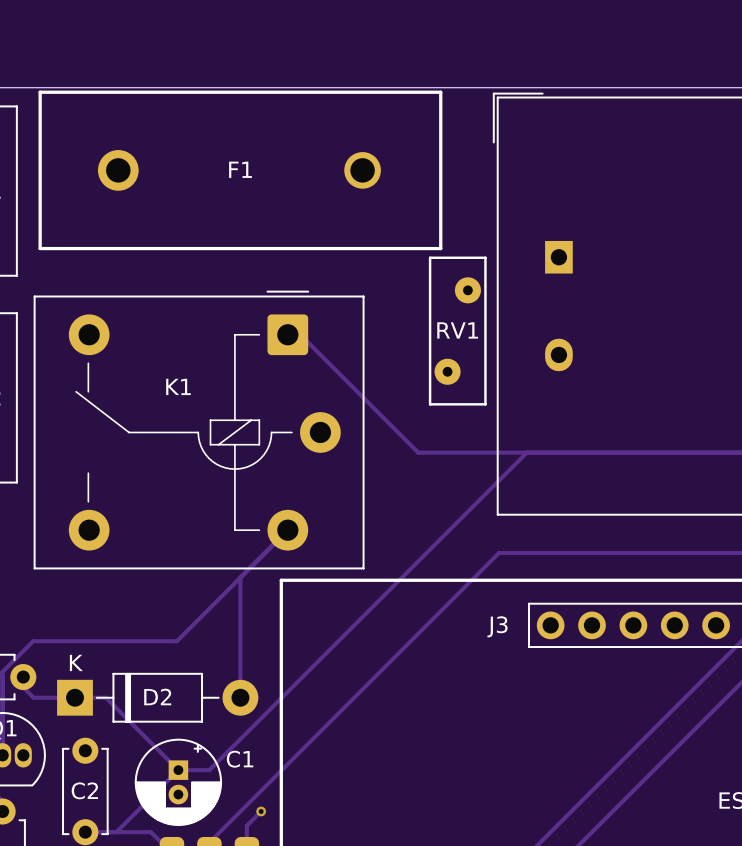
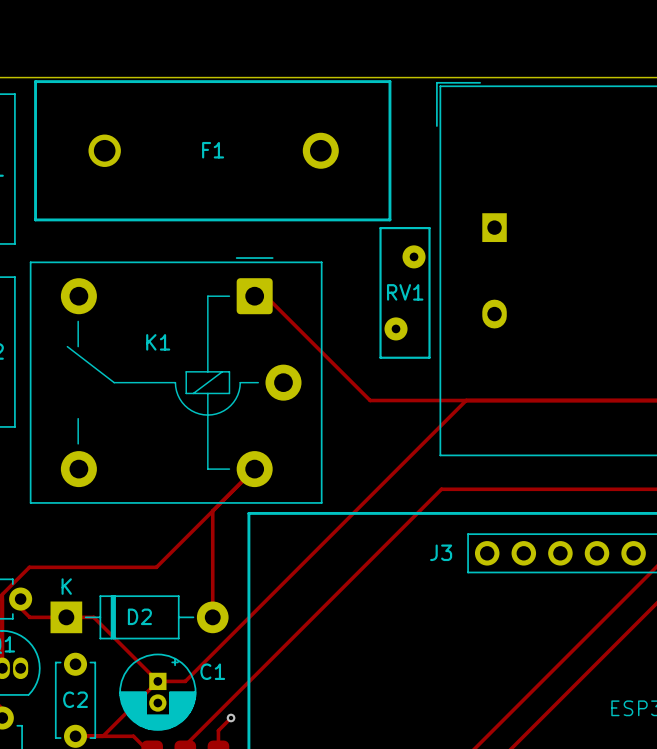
F1 rotation: 0° (240, 170) -> 180° (212, 150)

